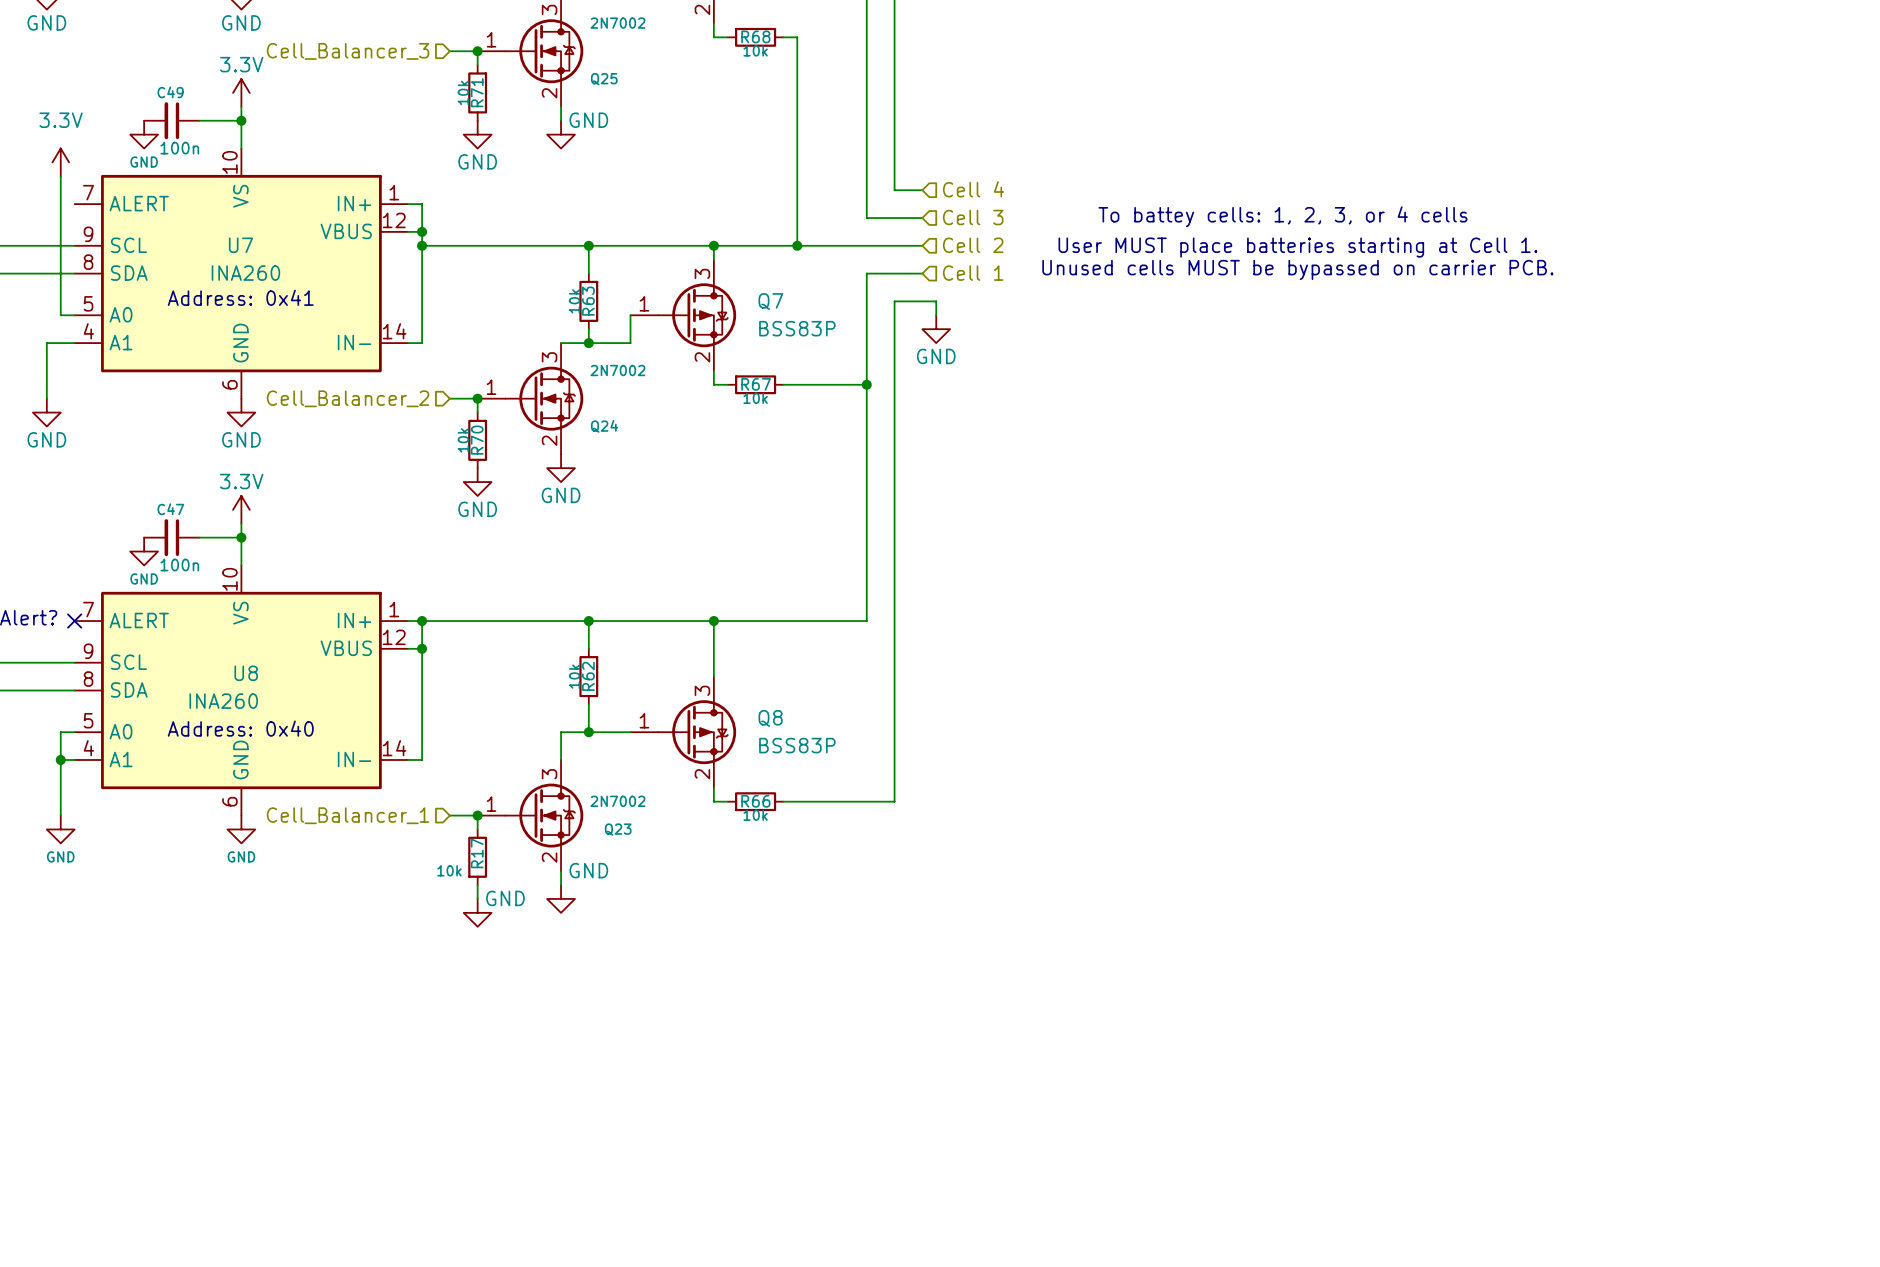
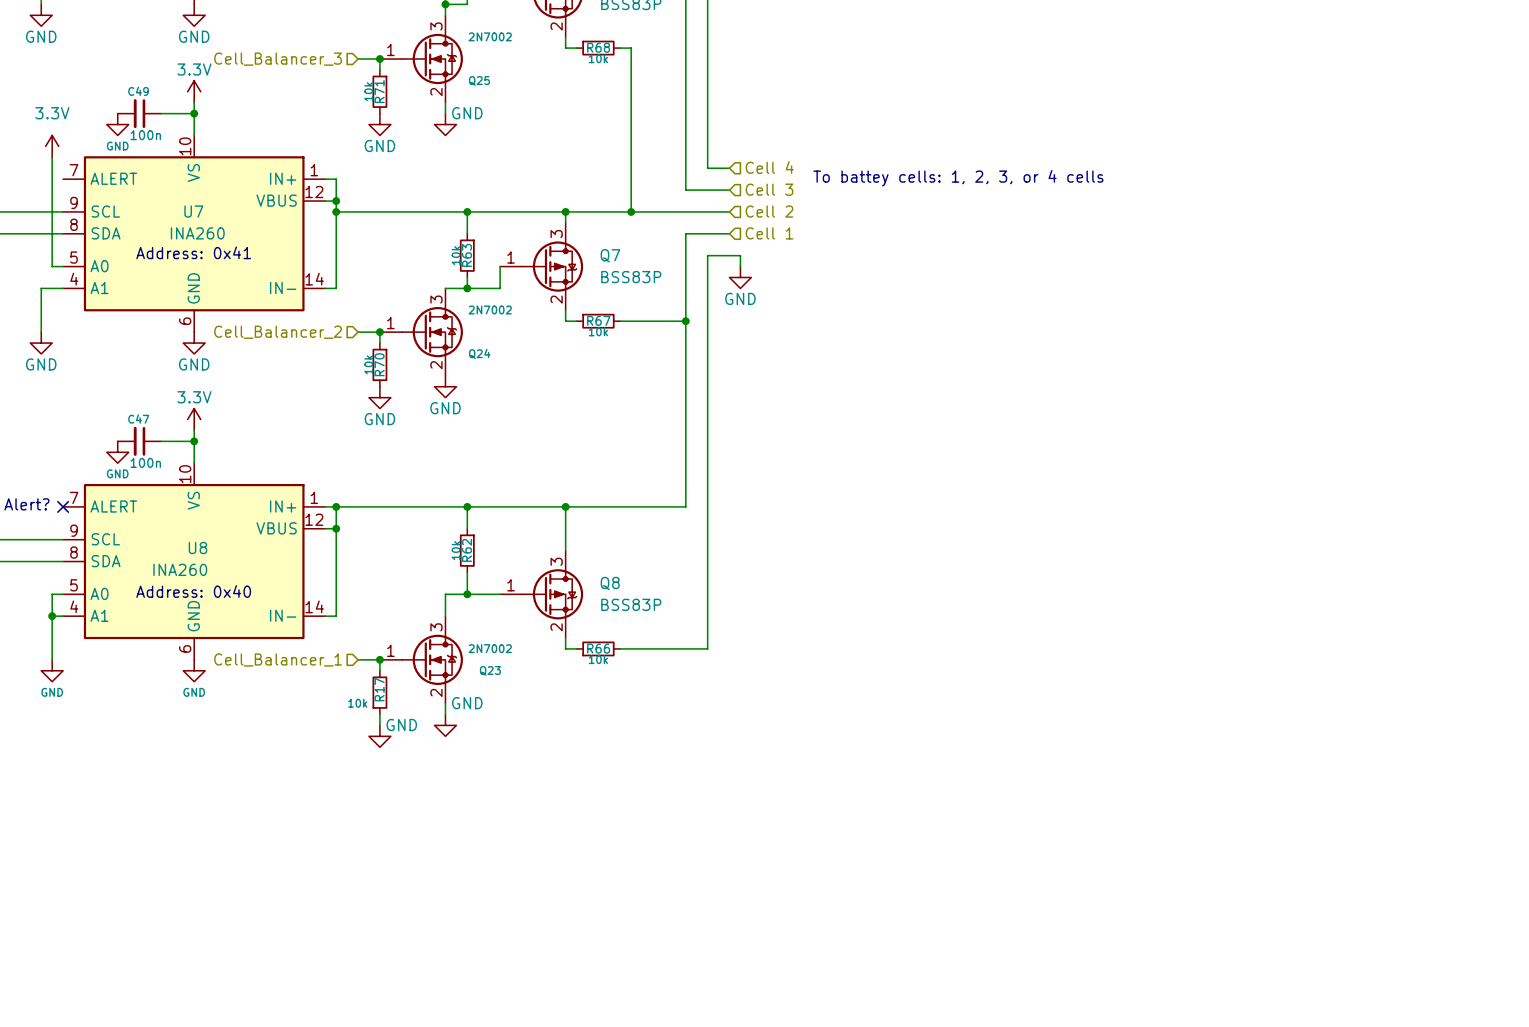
text position: To battey cells: 1, 2, 3, or 4 cells (1283, 216) -> To battey cells: 1, 2, 3, or 4 cells (958, 178)
text: User MUST place batteries starting at Cell 1. (1297, 247) -> none
text: Unused cells MUST be bypassed on carrier PCB. (1297, 269) -> none

